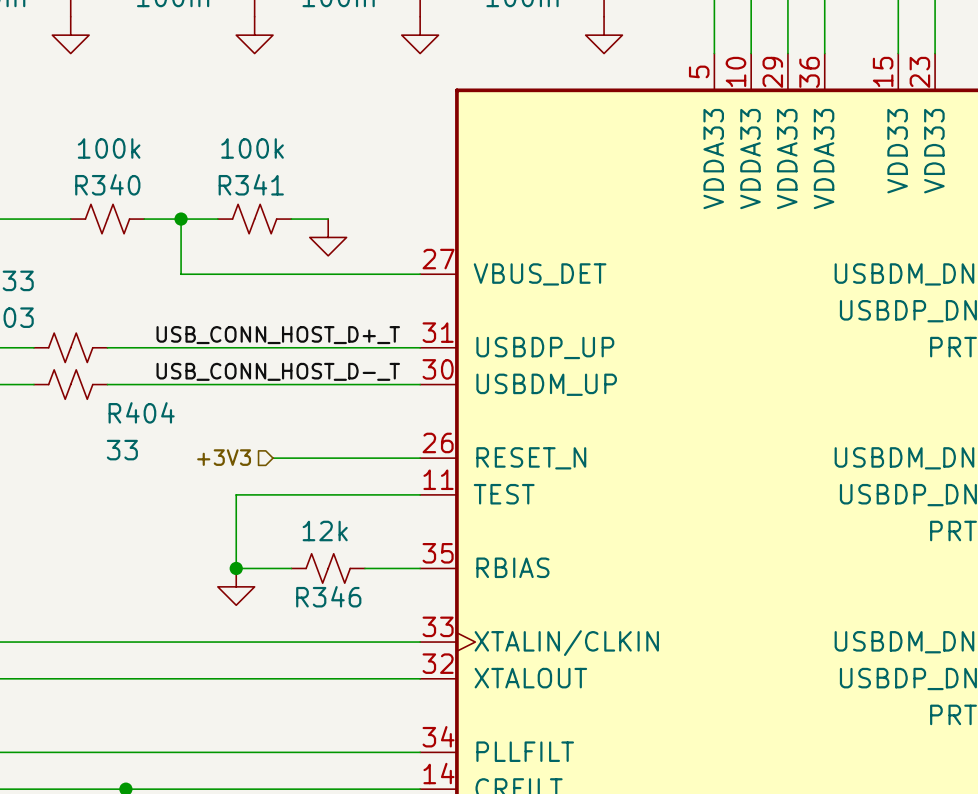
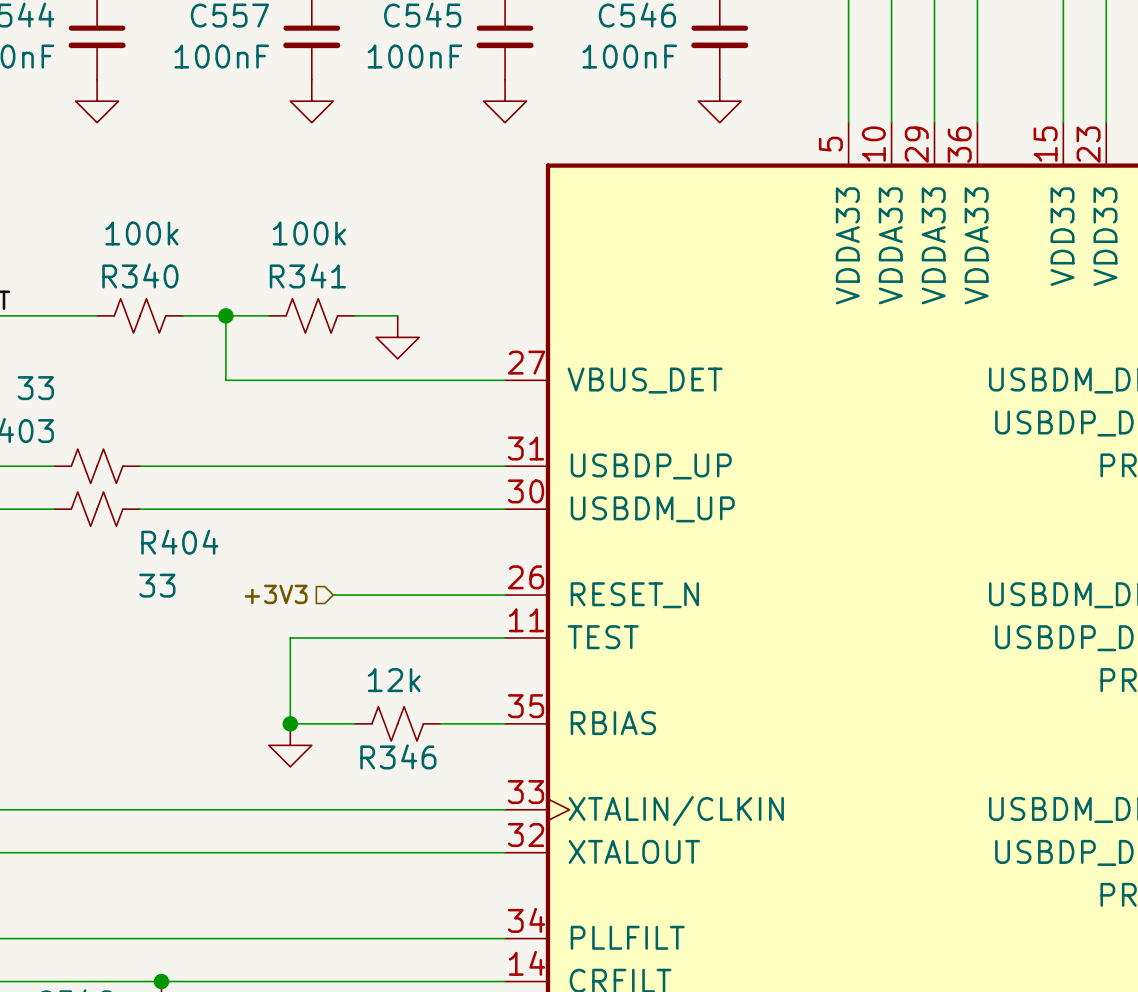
label: USB_CONN_HOST_D+_T (278, 335) -> none
label: USB_CONN_HOST_D-_T (278, 371) -> none

